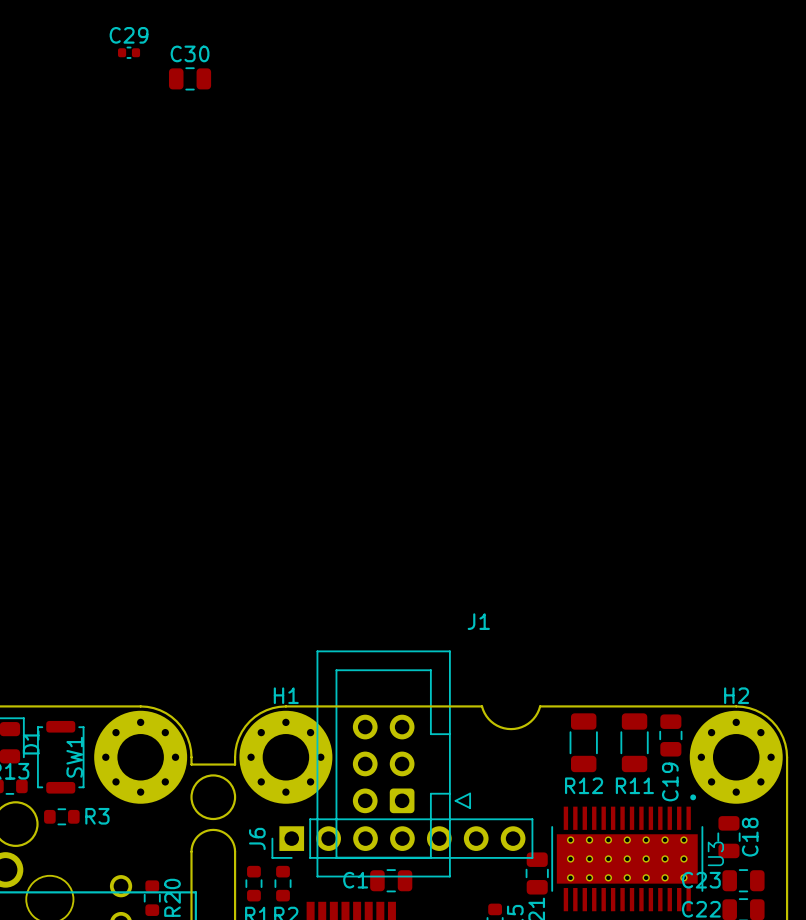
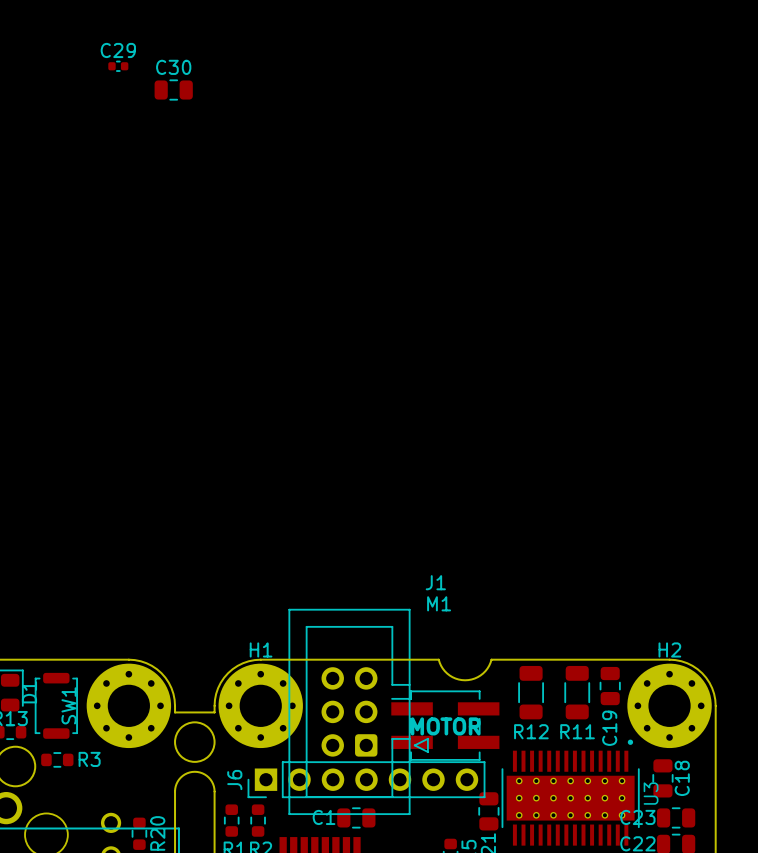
M1: none -> (445, 725)
text: none -> MOTOR (445, 726)

